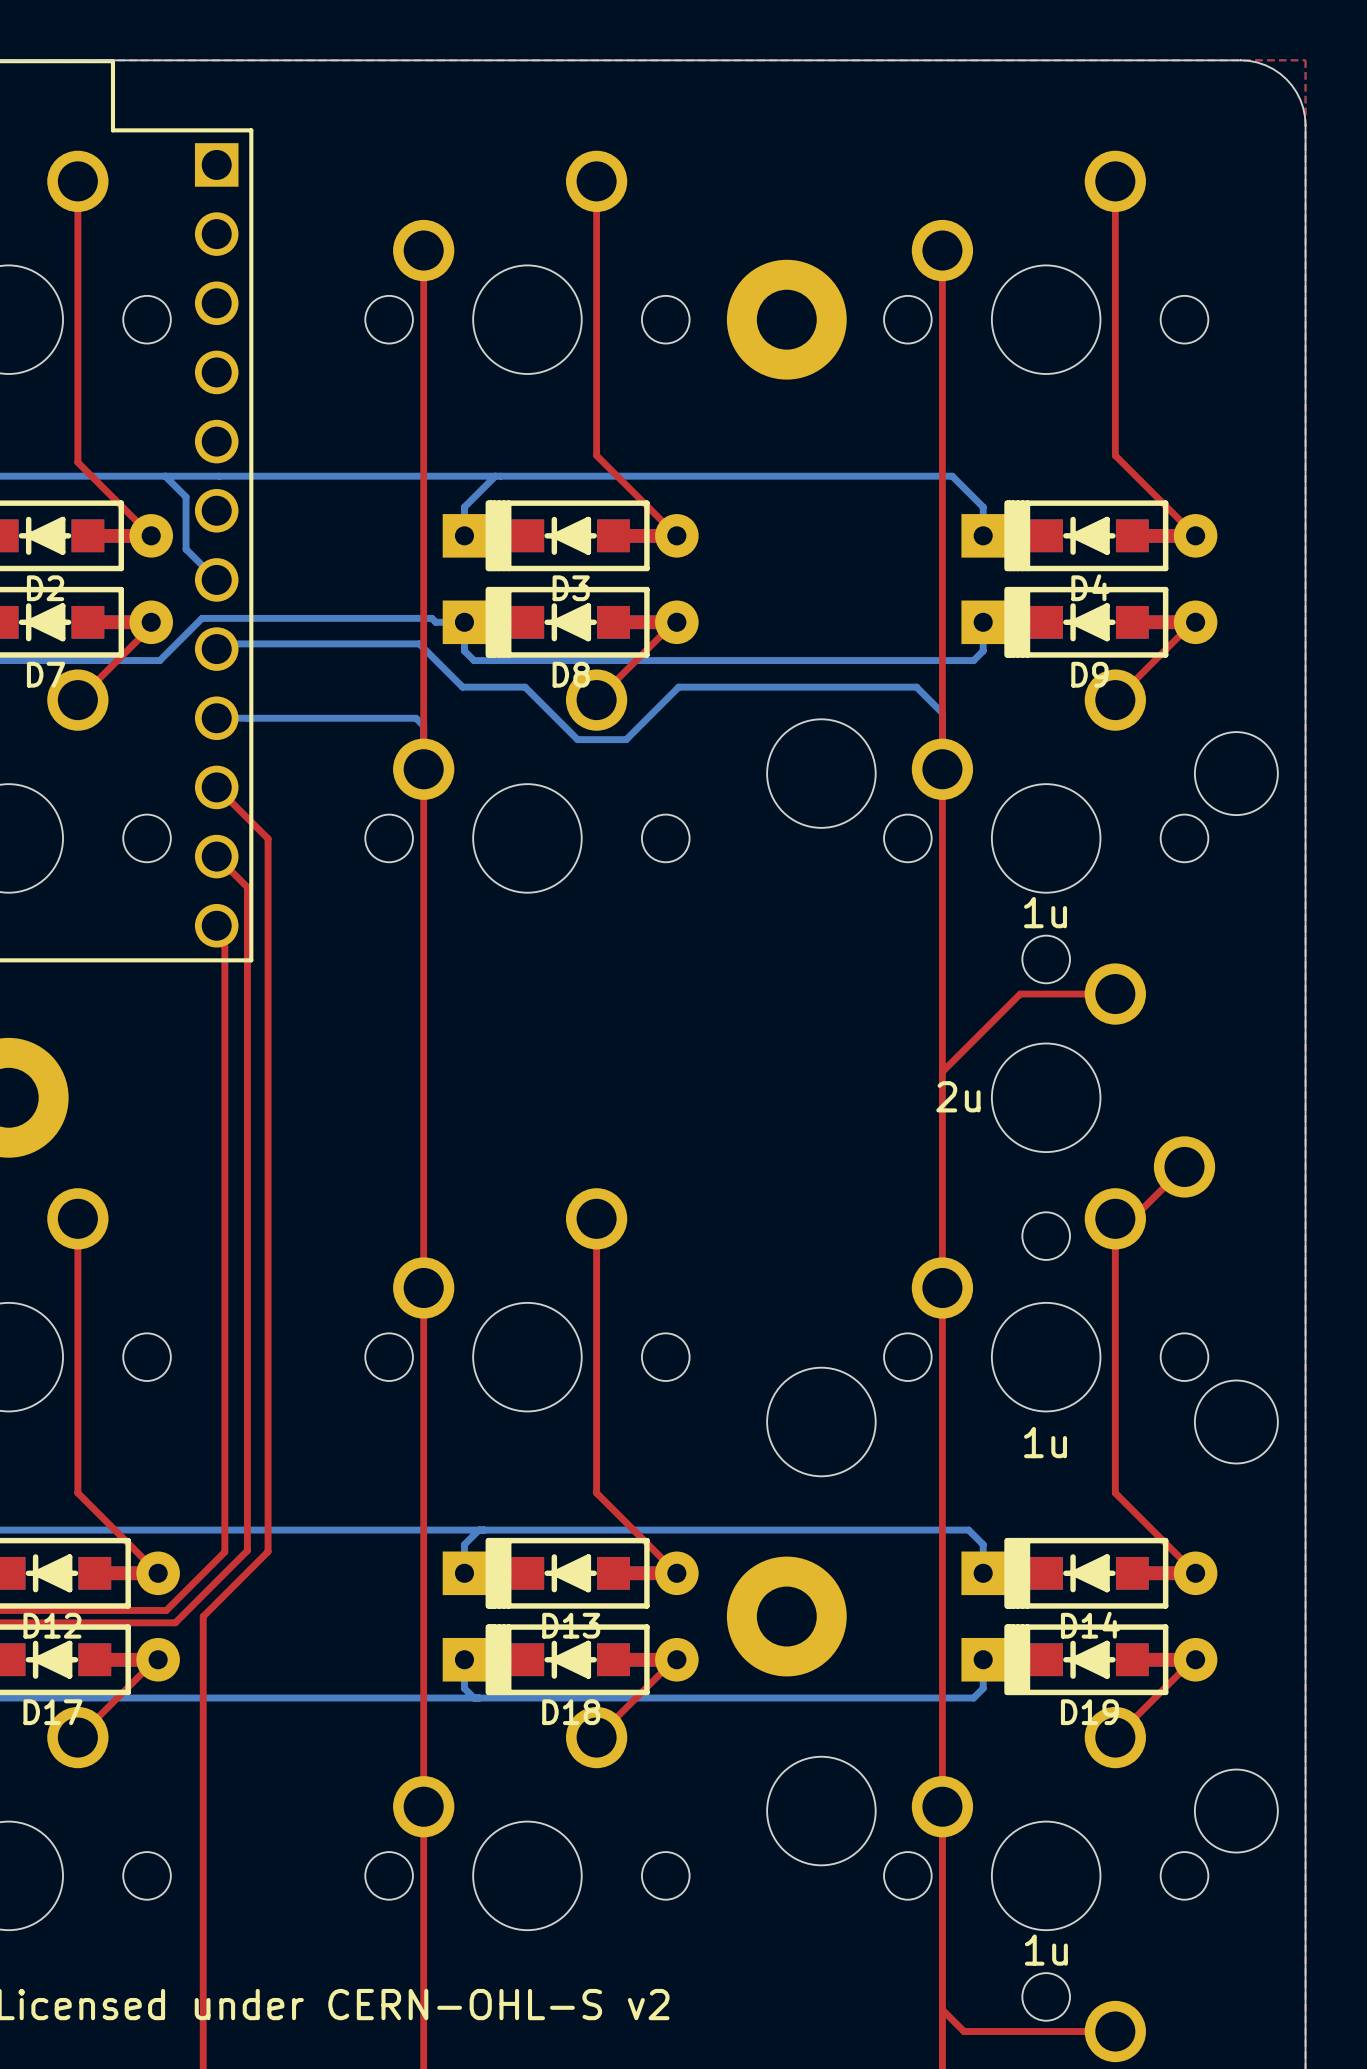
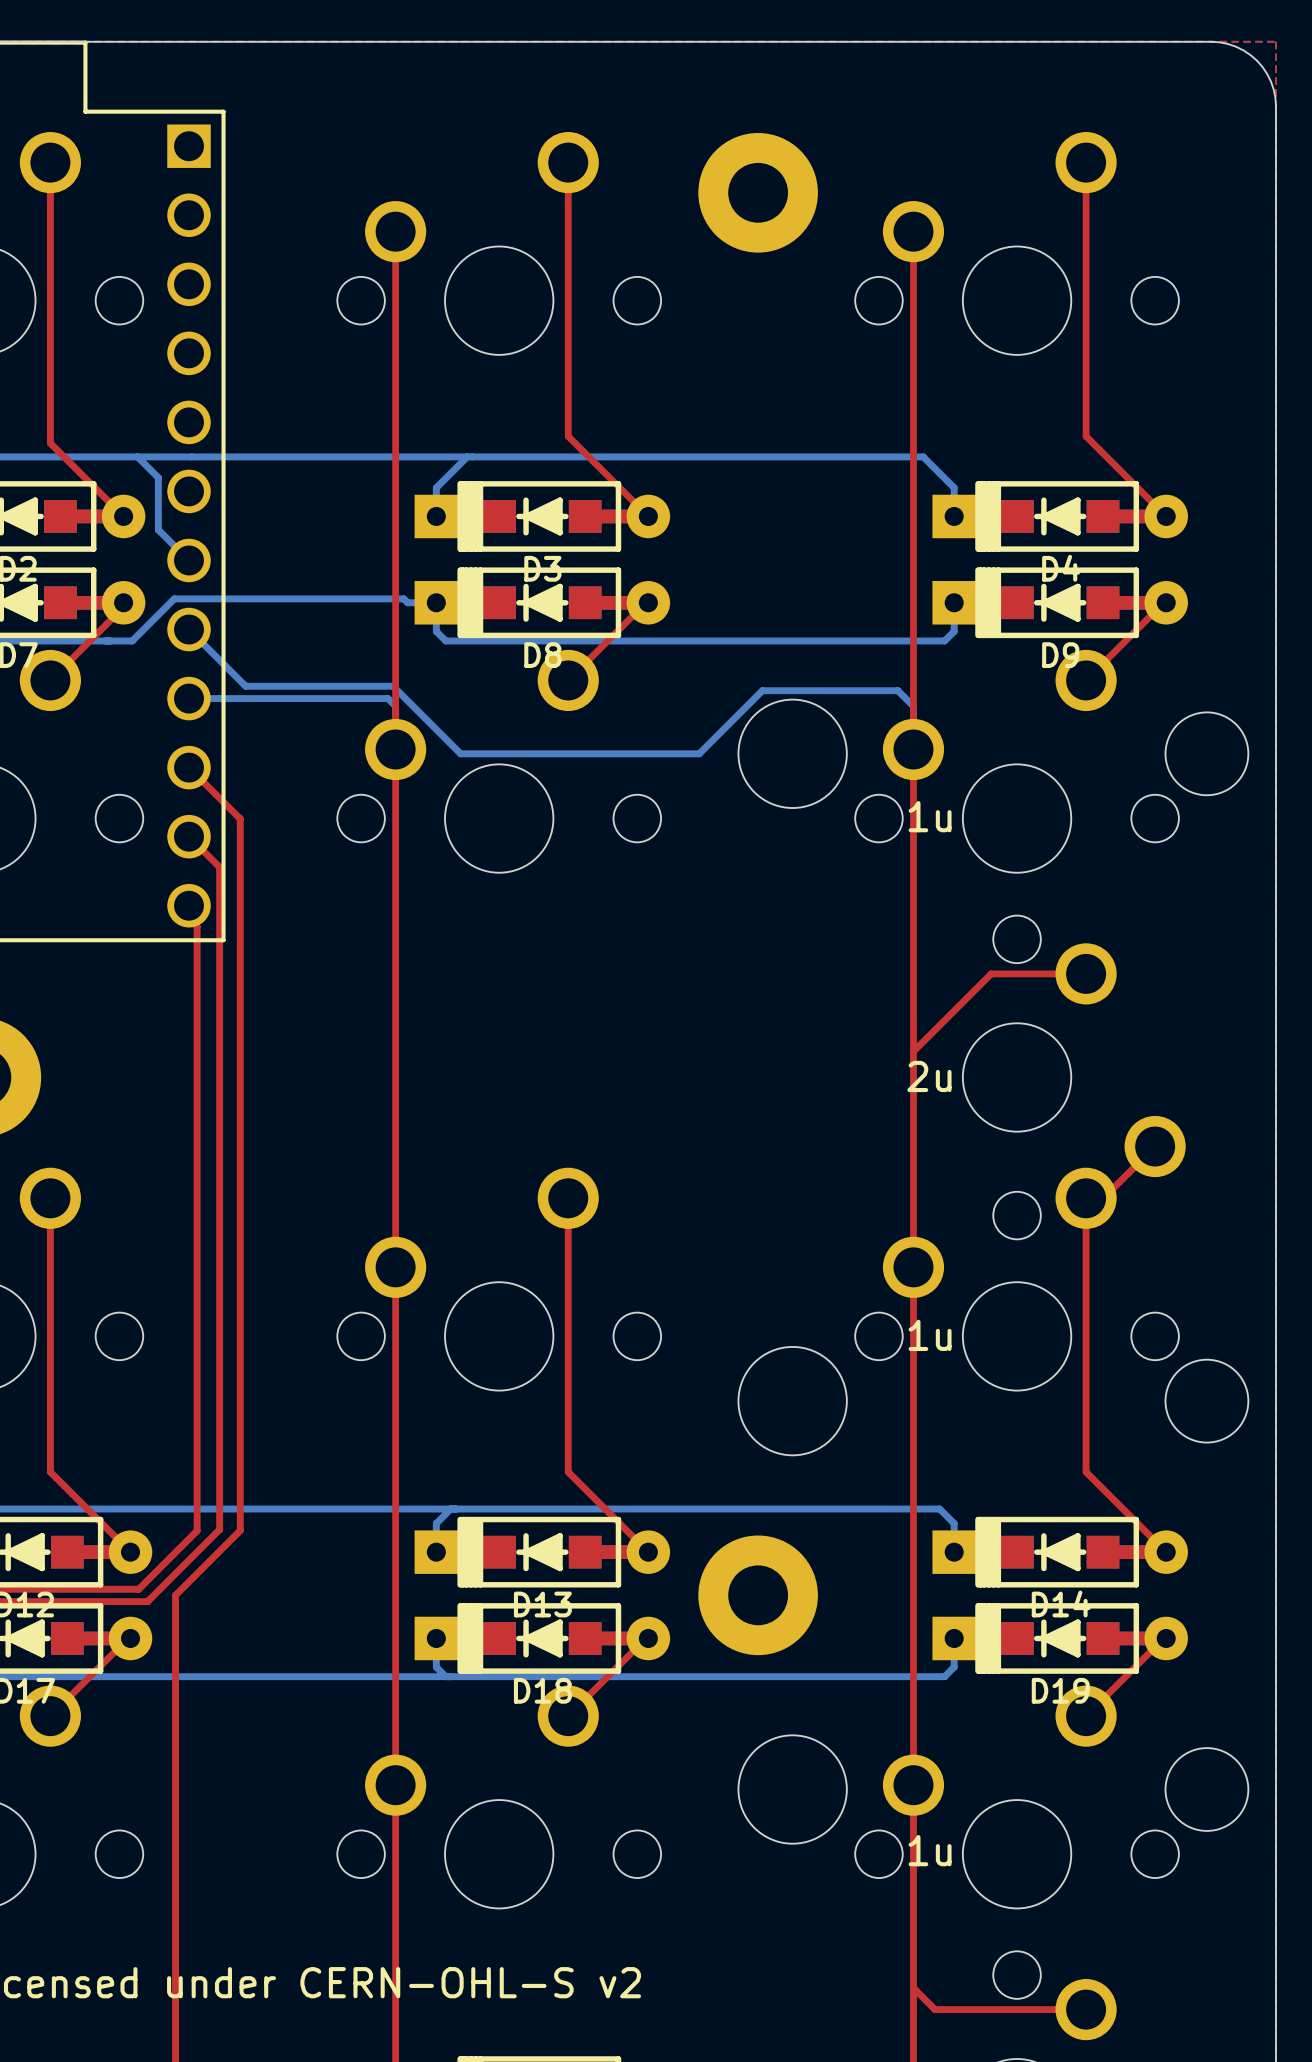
part position: (786, 319) -> (758, 192)
bottom track: (216, 649) (221, 643) (419, 643) (462, 687) (525, 687) (577, 739) (626, 739) (678, 687) (916, 687) (942, 713) (942, 725) -> (189, 629) (245, 686) (393, 686) (460, 753) (699, 753) (762, 690) (897, 690) (913, 706)
text position: 1u (1045, 912) -> 1u (930, 816)
text position: 1u (1045, 1442) -> 1u (930, 1335)
text position: 1u (1046, 1950) -> 1u (930, 1850)

